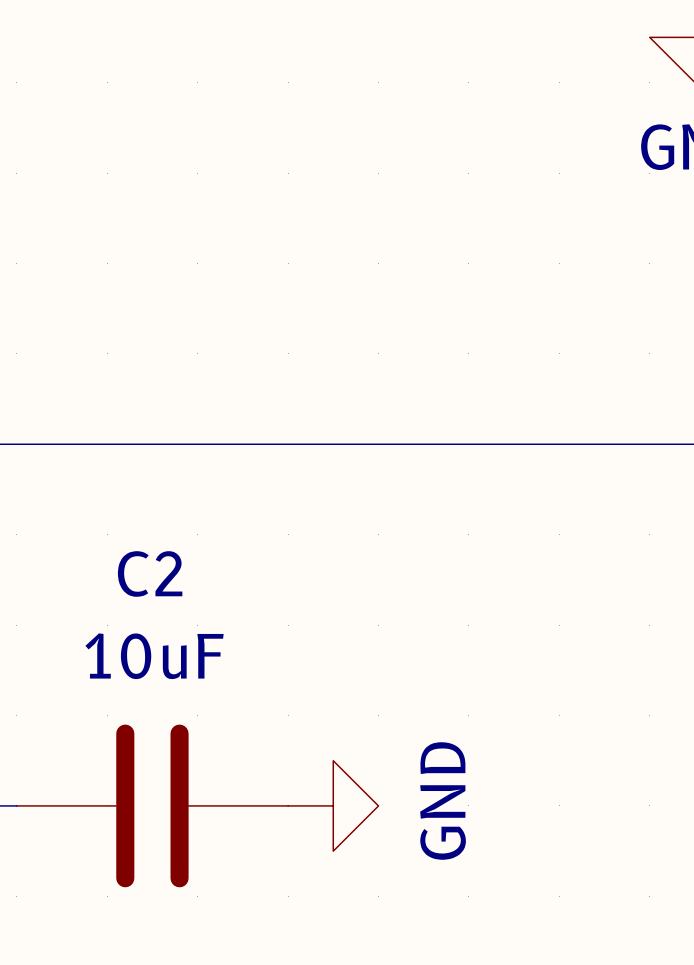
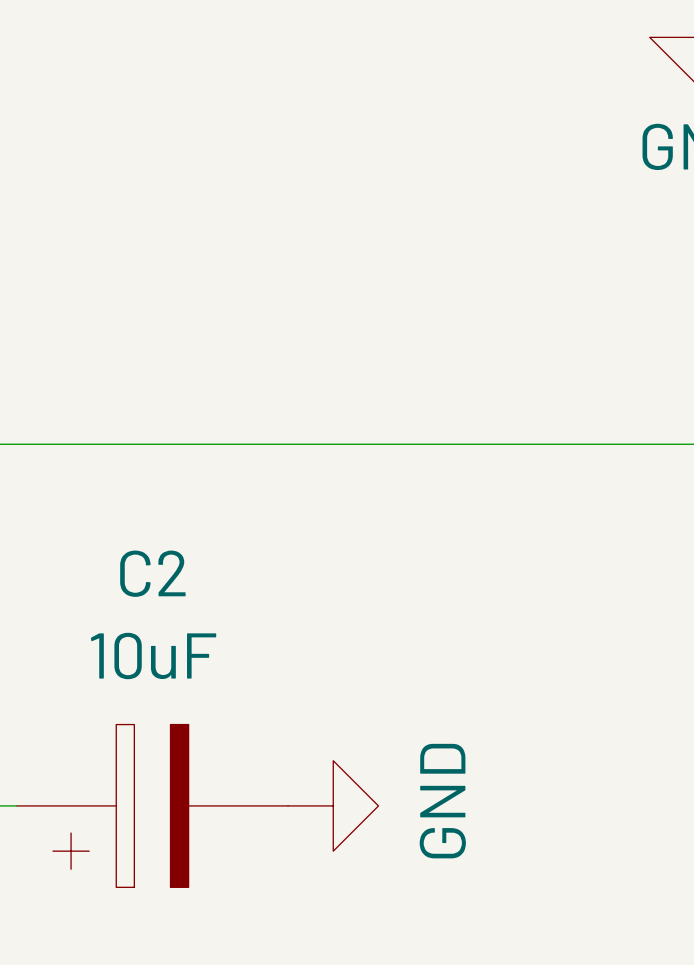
C2 symbol: [16, 724, 289, 888] -> [16, 724, 289, 888]

